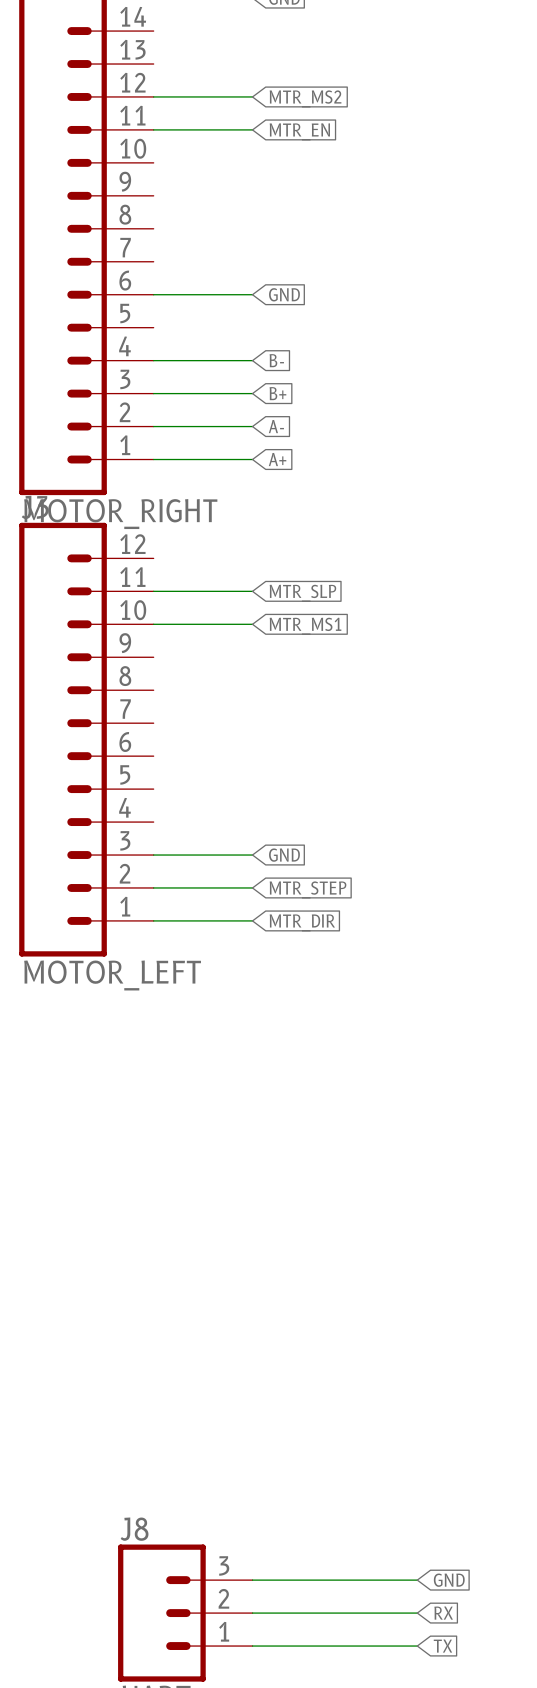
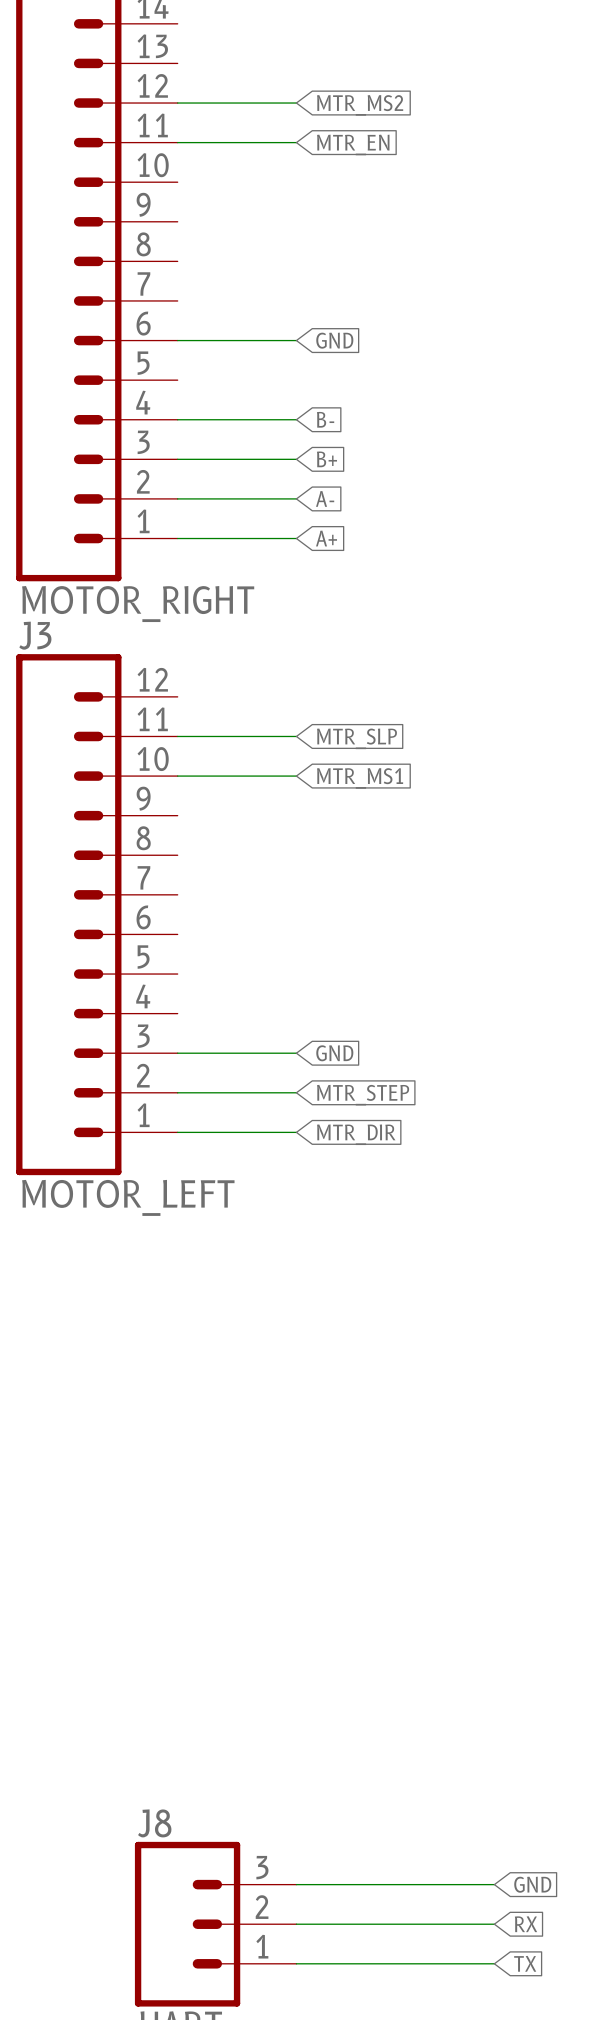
wire: (153, 591) (252, 591) -> (177, 776) (296, 776)
global label: MTR_SLP (302, 593) -> none
global label: MTR_MS1 (305, 626) -> MTR_SLP (357, 738)
global label: none -> MTR_MS1 (360, 778)
J3 position: (86, 739) -> (96, 914)
wire: (153, 855) (252, 855) -> (177, 1132) (296, 1132)
global label: GND (284, 855) -> none
global label: MTR_STEP (308, 889) -> GND (334, 1053)
global label: MTR_DIR (302, 922) -> MTR_STEP (363, 1095)
global label: none -> MTR_DIR (356, 1134)

